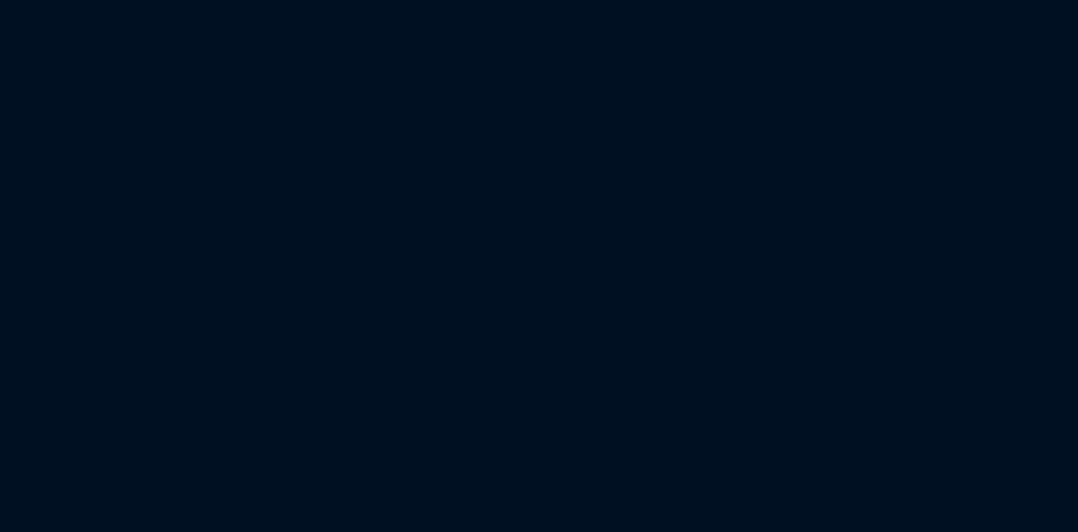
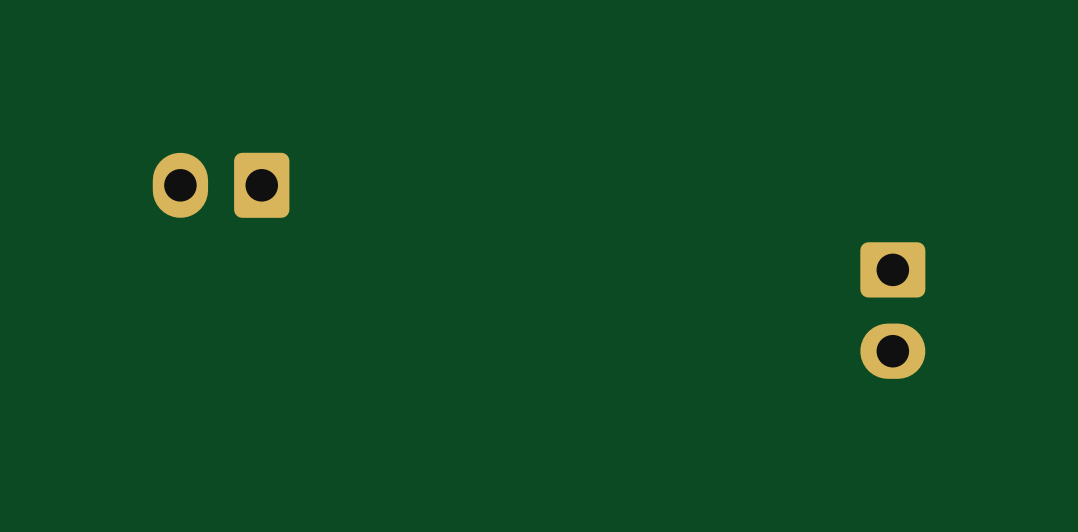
part: none -> (221, 185)
part: none -> (892, 310)

